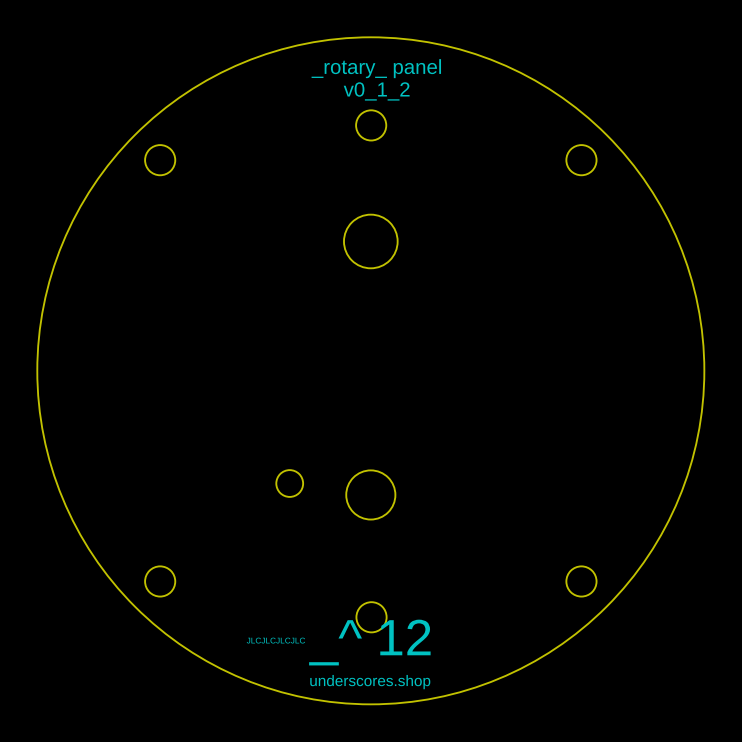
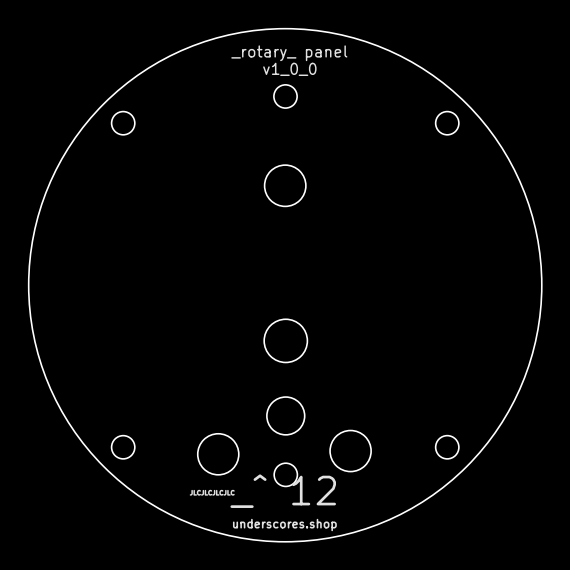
text: v0_1_2 (376, 91) -> v1_0_0 (289, 69)
round board edge: none -> [264, 319, 308, 363]
round board edge: [275, 469, 304, 498] -> none
round board edge: [345, 469, 396, 520] -> none
round board edge: none -> [266, 396, 305, 435]
round board edge: none -> [329, 430, 372, 472]
round board edge: none -> [197, 433, 239, 475]

